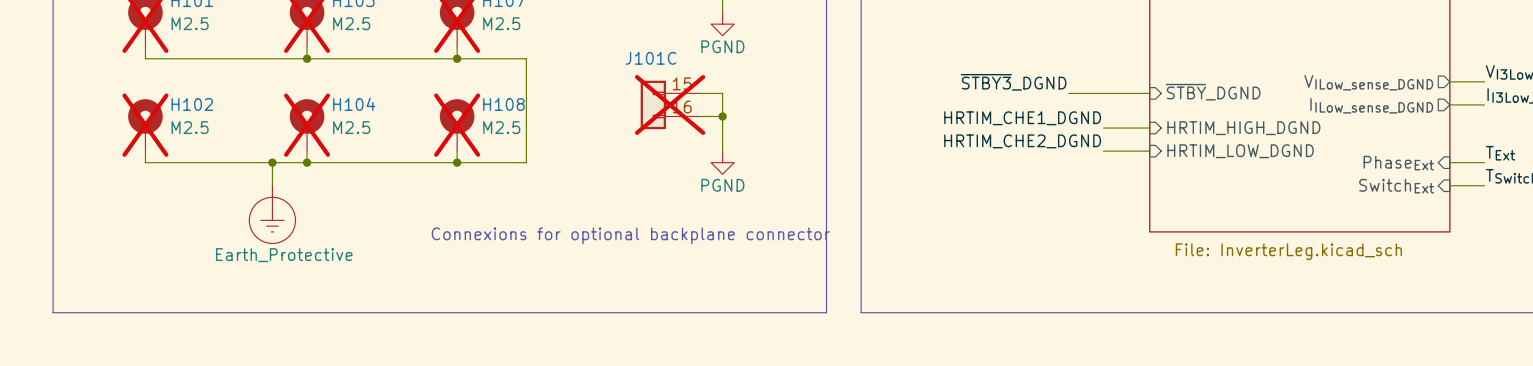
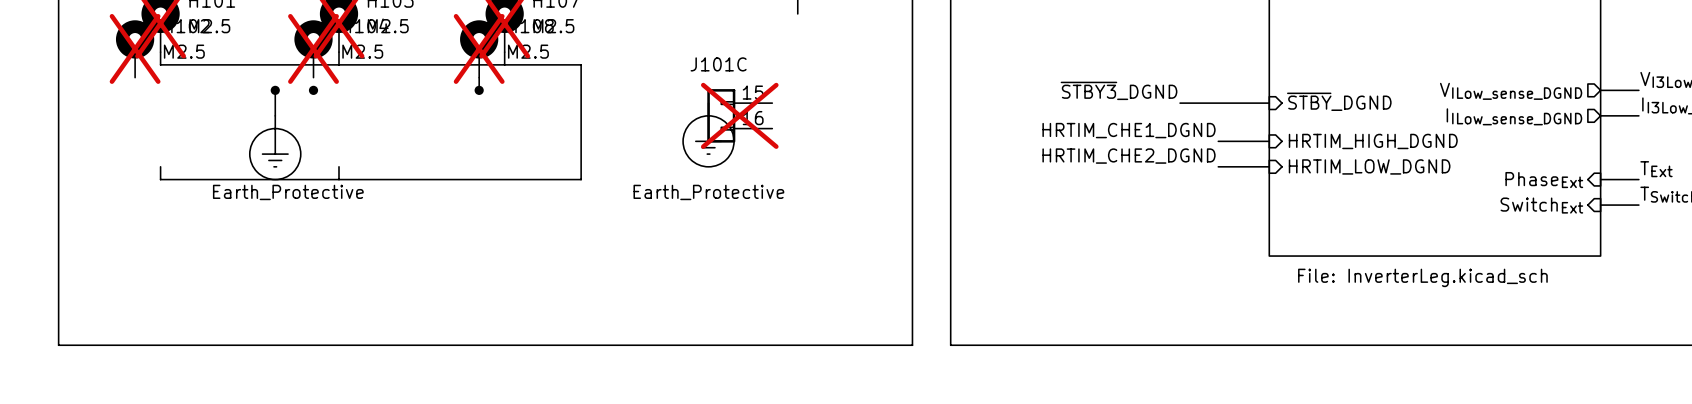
power symbol: PGND (722, 24) -> none
junction: (307, 58) -> none
junction position: (457, 58) -> (479, 90)
junction: none -> (275, 90)
junction: none -> (313, 90)
wire: (699, 93) (722, 93) (722, 151) -> none
wire: (699, 116) (722, 116) -> none
junction: (722, 116) -> none
power symbol: none -> Earth_Protective (708, 134)
H102 position: (145, 125) -> (135, 48)
H104 position: (307, 125) -> (313, 48)
H108 position: (457, 125) -> (479, 48)
wire: (457, 151) (457, 162) -> (479, 77) (479, 90)
wire: (272, 162) (272, 185) -> (275, 90) (275, 115)
junction: (272, 162) -> none
junction: (307, 162) -> none
junction: (457, 162) -> none
power symbol: PGND (722, 162) -> none
power symbol position: Earth_Protective (272, 214) -> Earth_Protective (275, 147)
text: Connexions for optional backplane connector (630, 235) -> none

